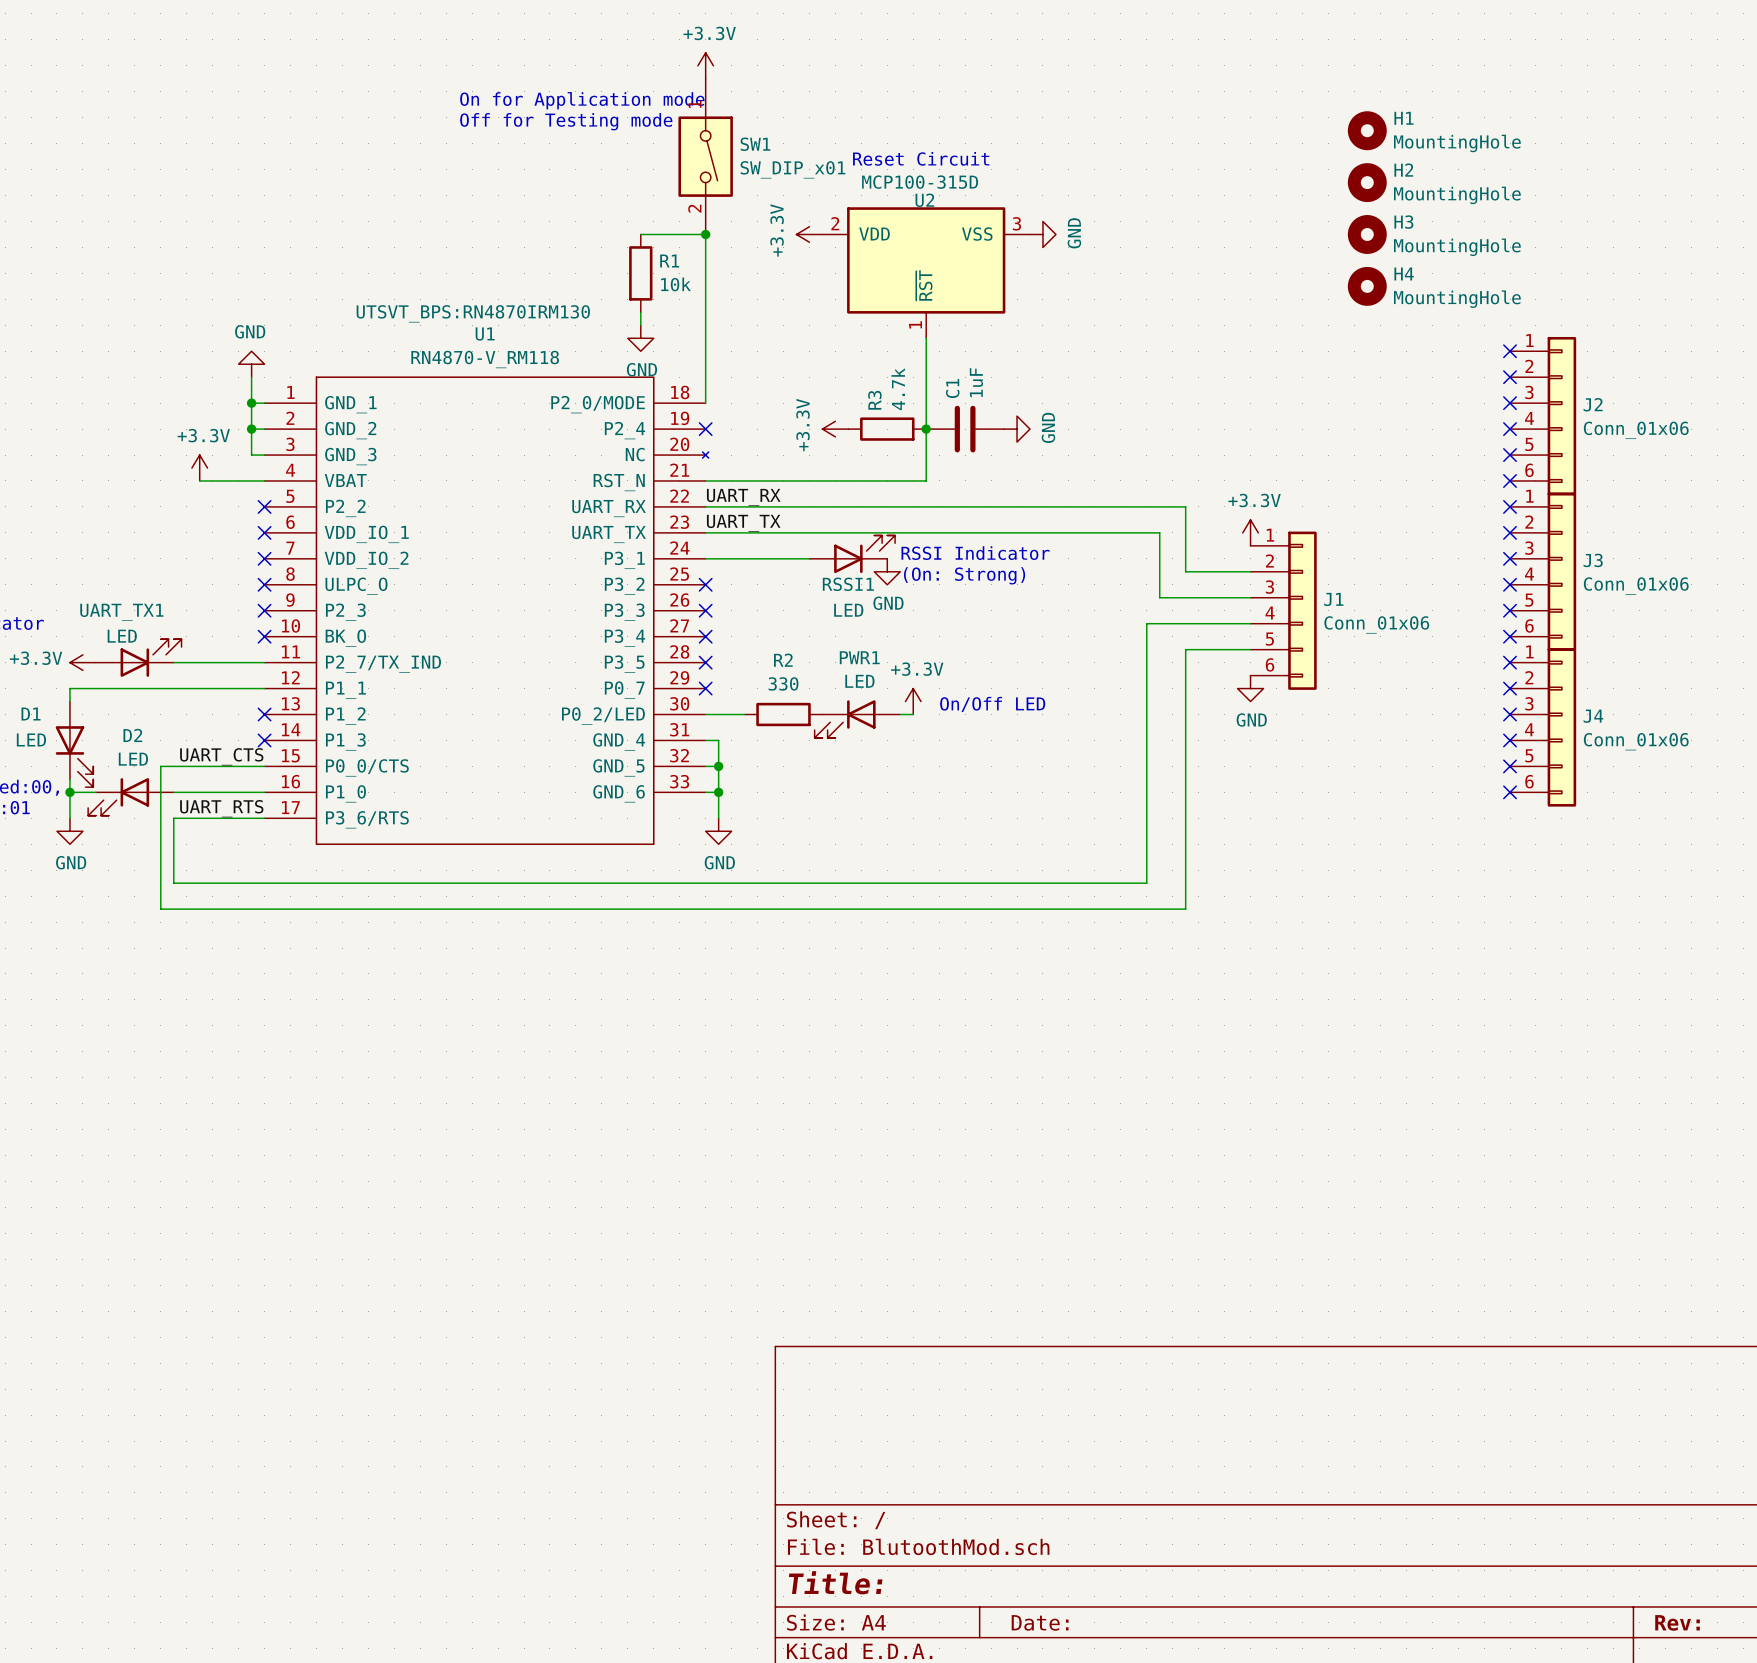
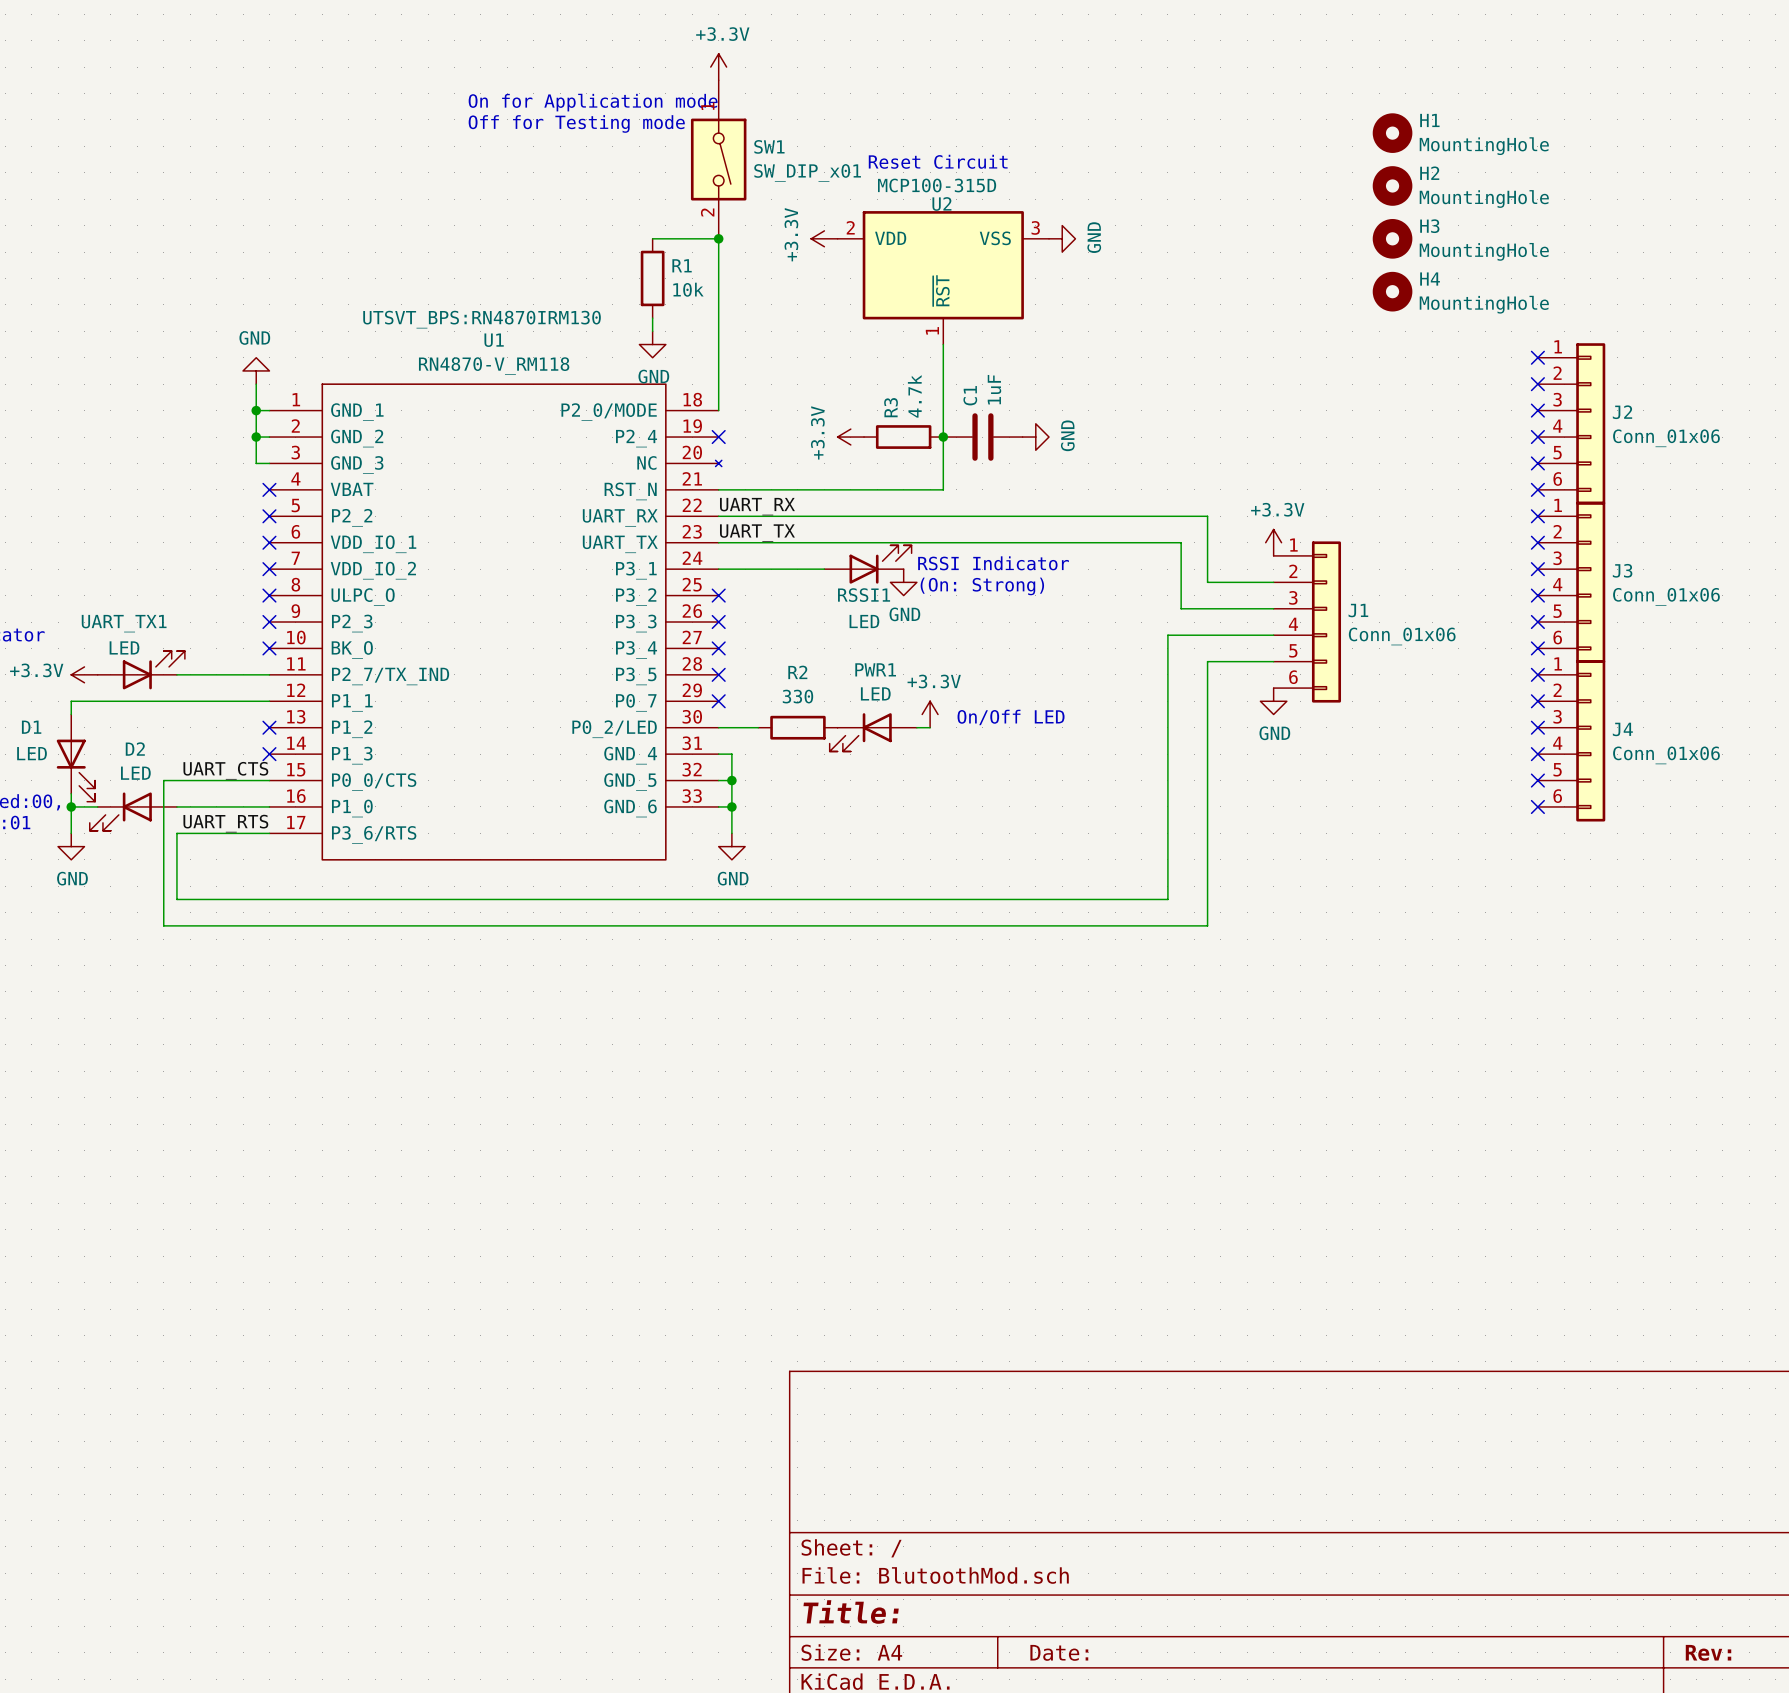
power symbol: +3.3V (199, 468) -> none
wire: (199, 480) (264, 480) -> none
no-connect mark: none -> (269, 489)

